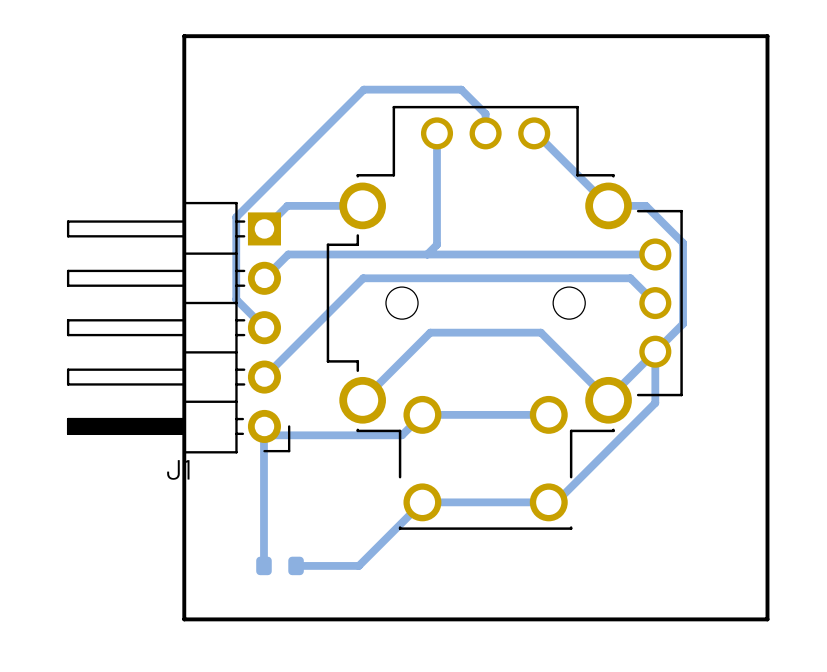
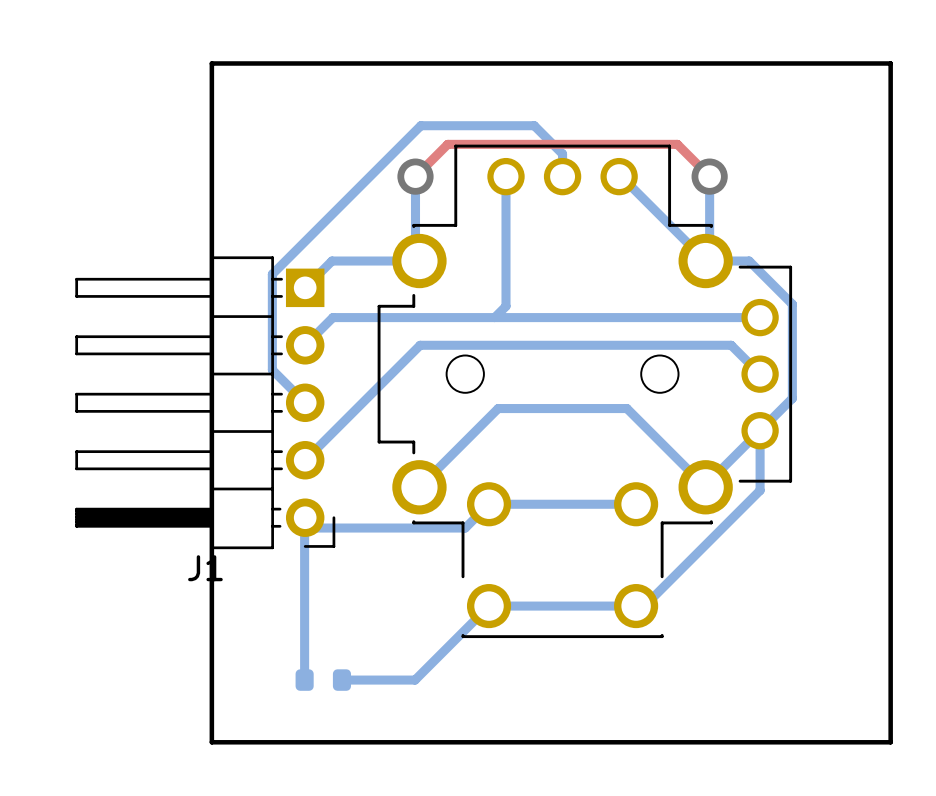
bottom track: none -> (415, 176) (415, 257) (419, 261)
top track: none -> (415, 176) (447, 144) (677, 144) (709, 176)
via: none -> (415, 176)
bottom track: none -> (709, 176) (709, 257) (705, 261)
via: none -> (709, 176)

